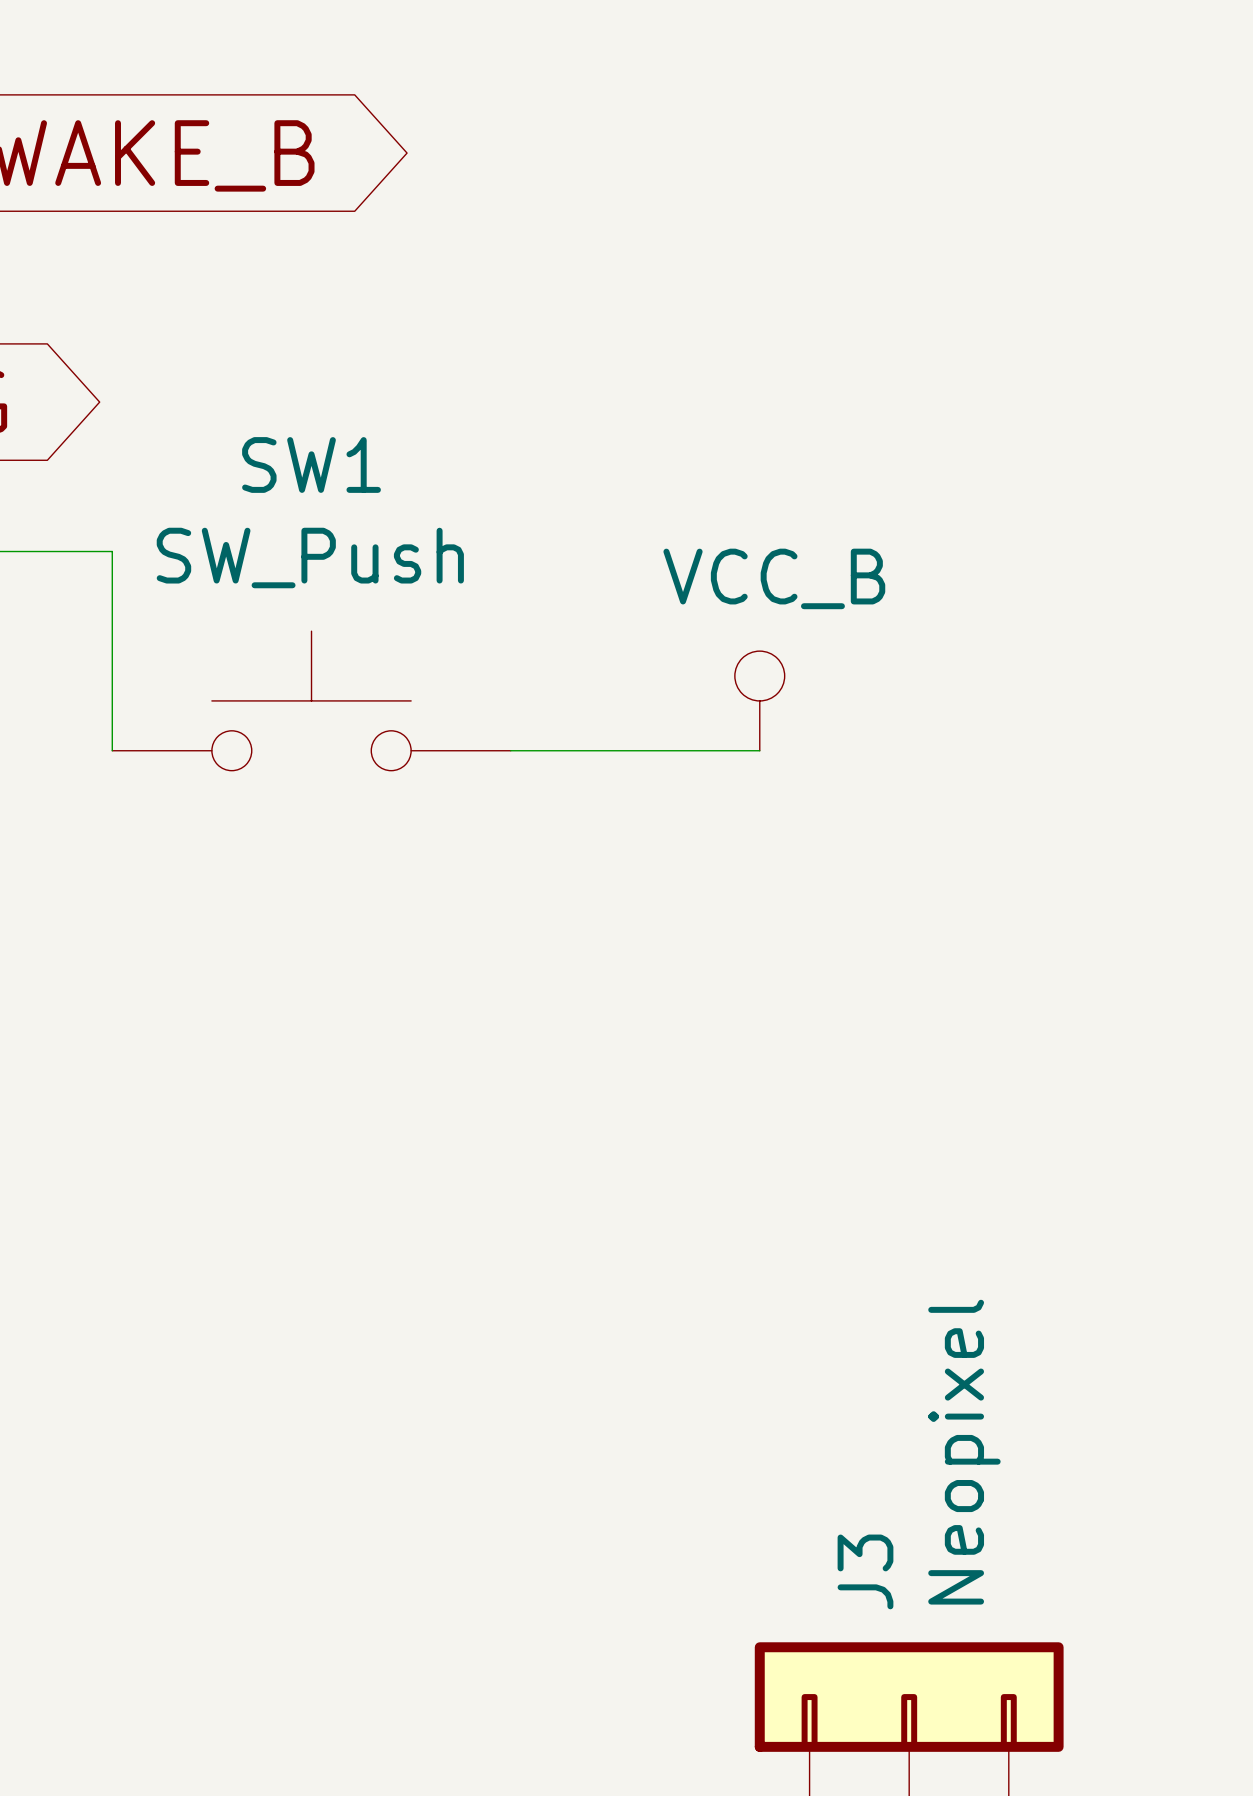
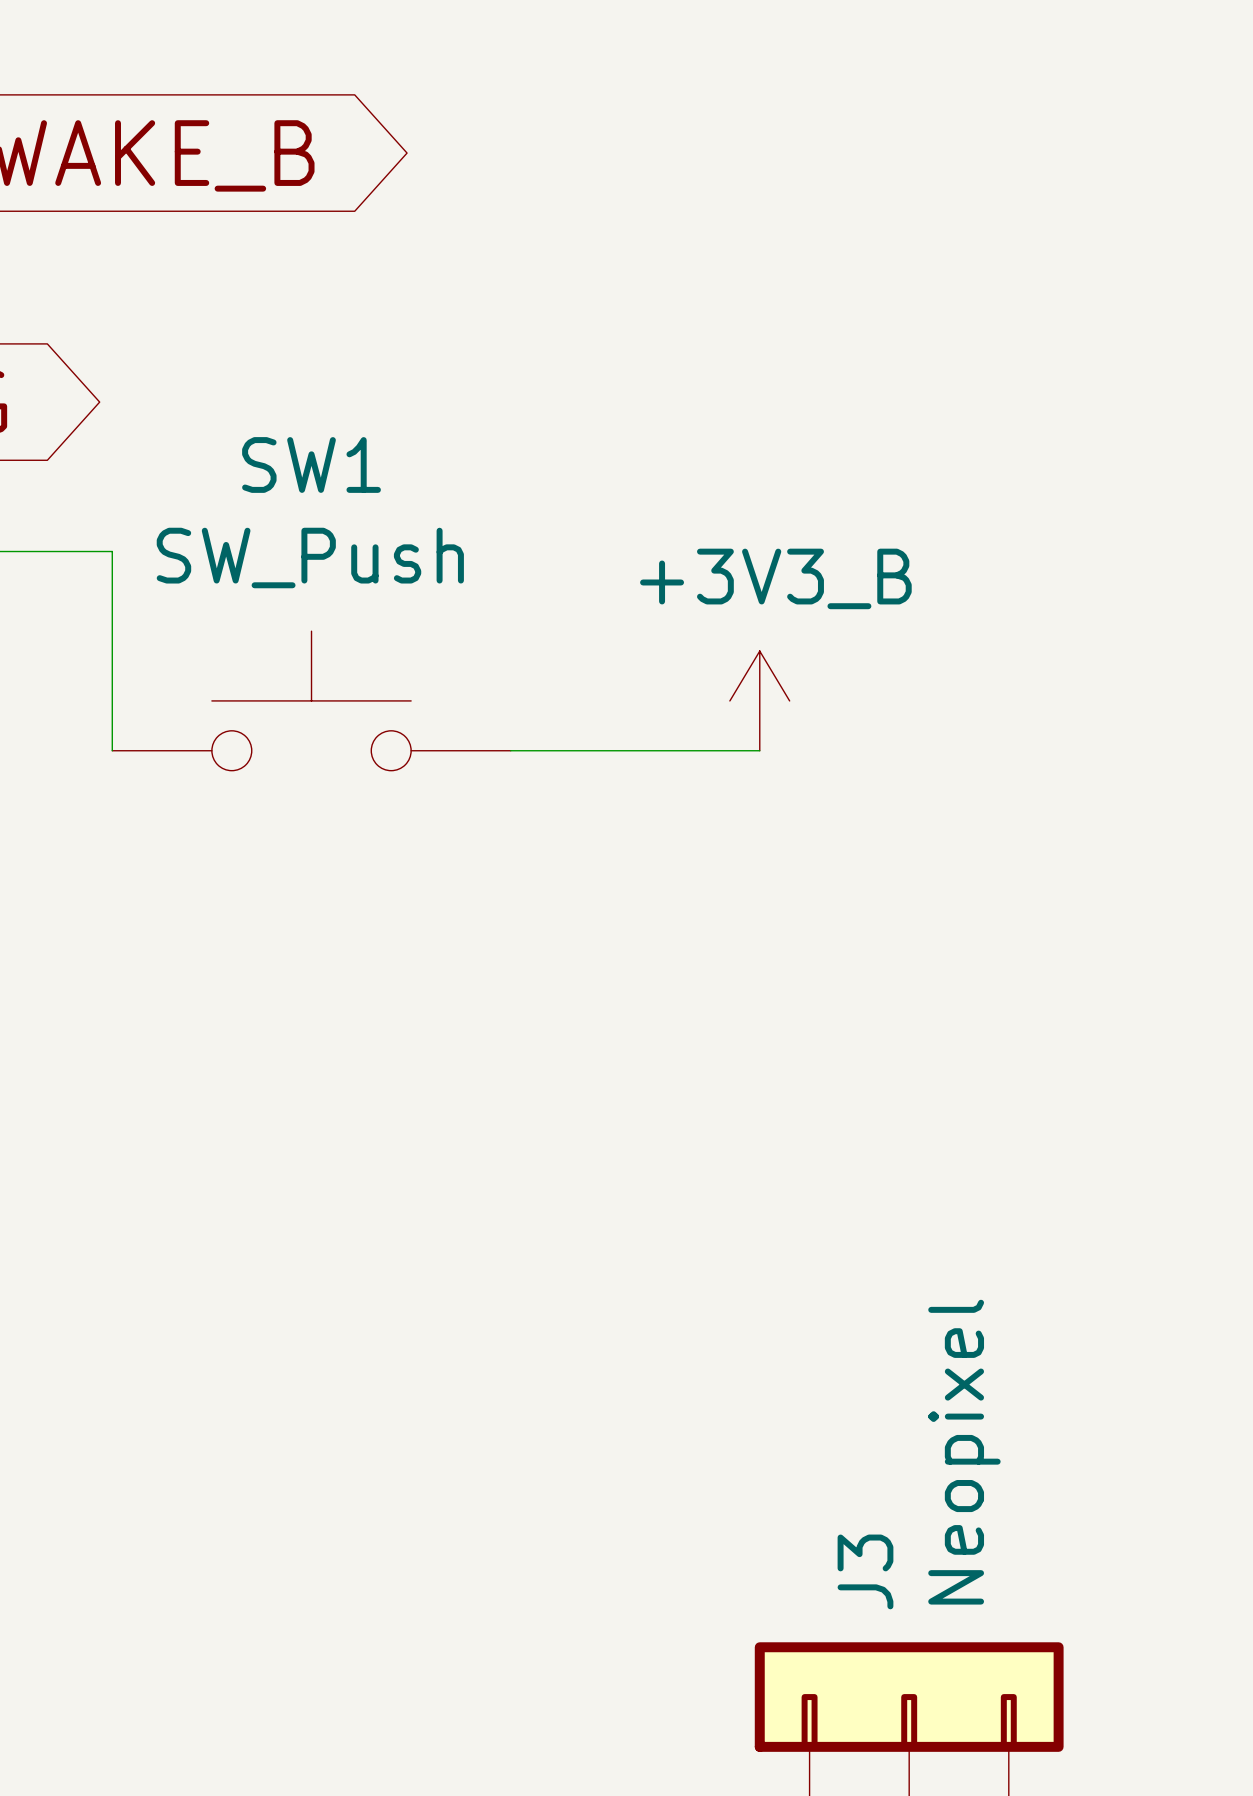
power symbol: VCC_B (759, 700) -> +3V3_B (759, 700)

